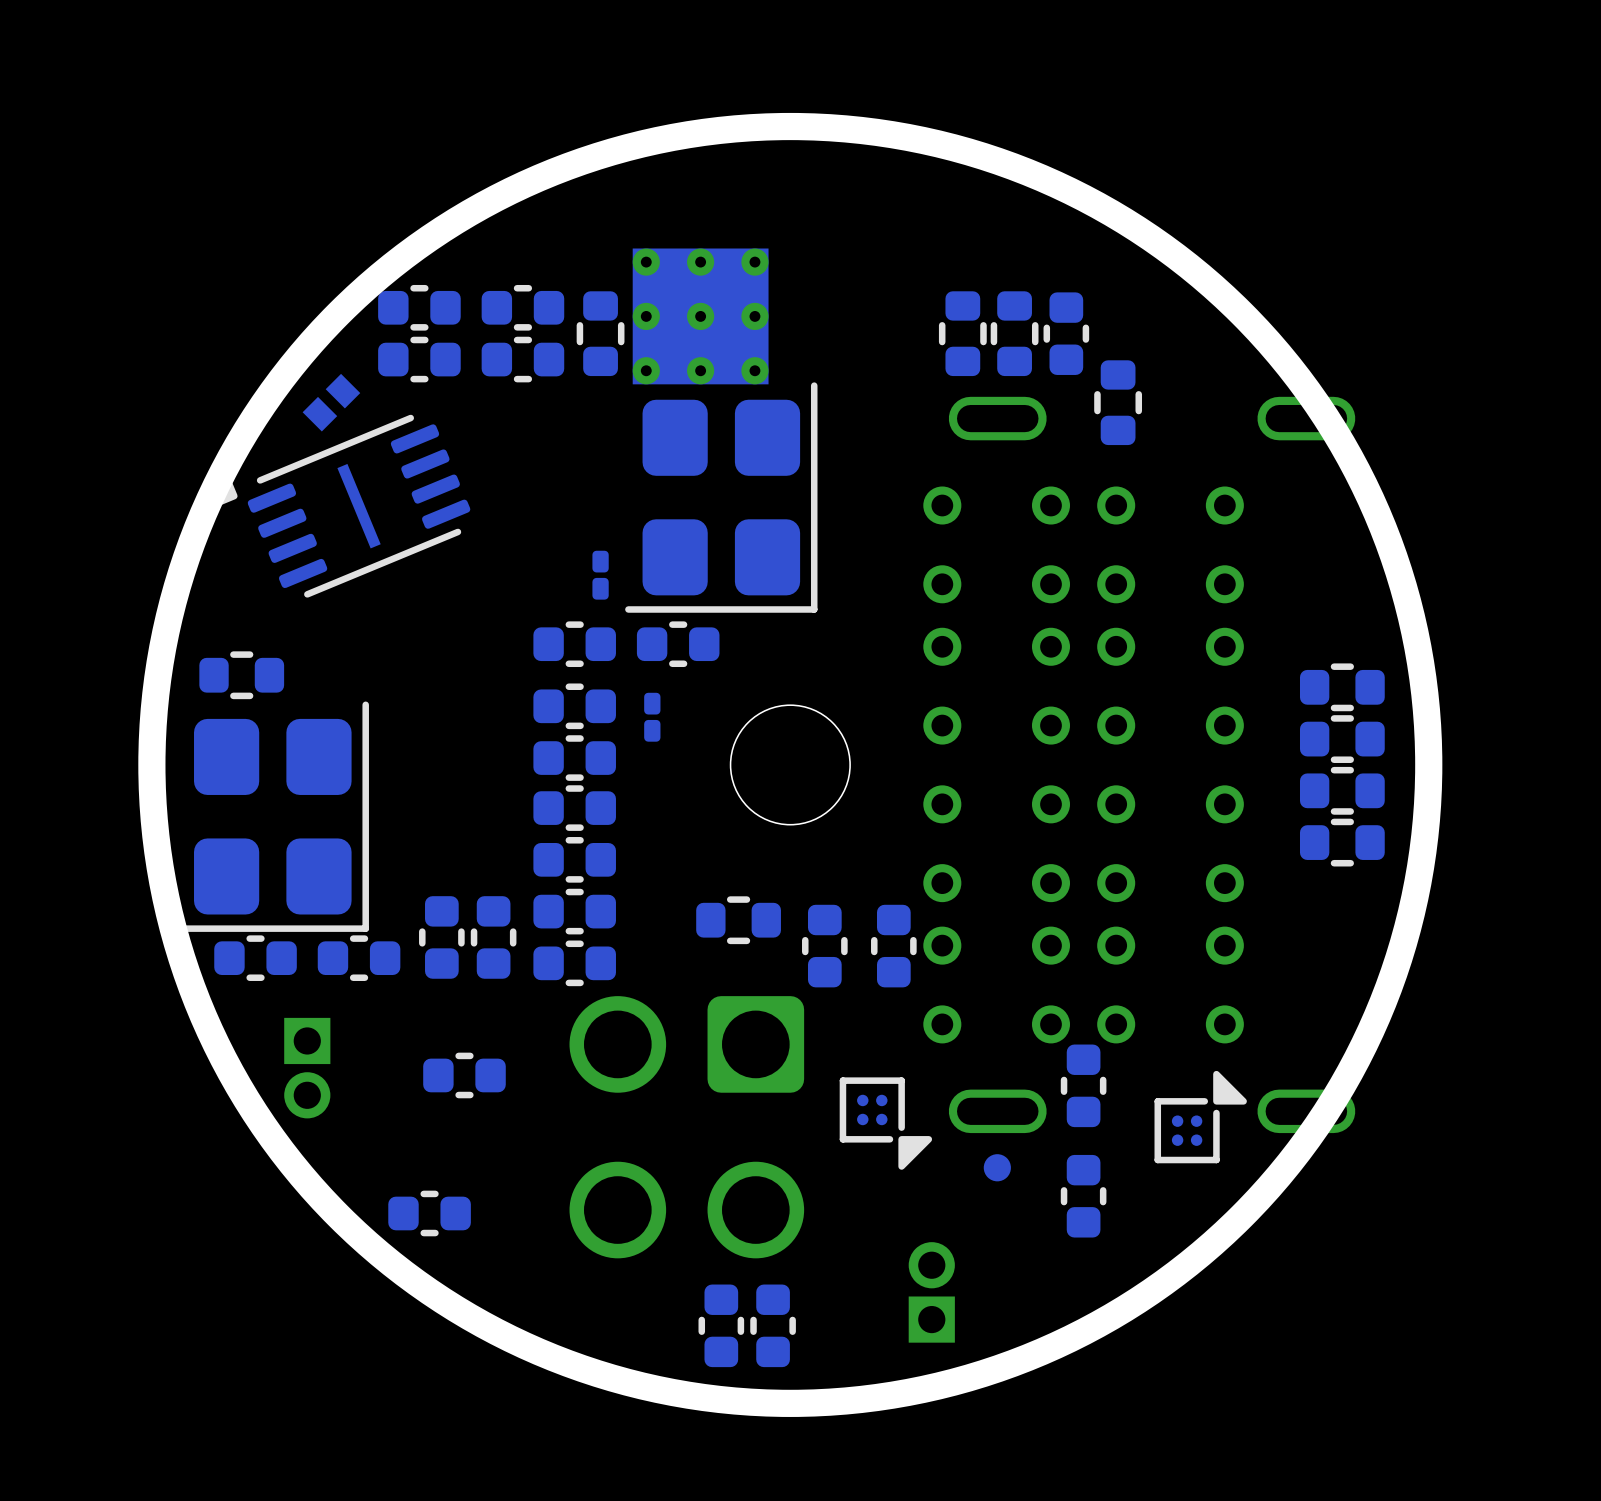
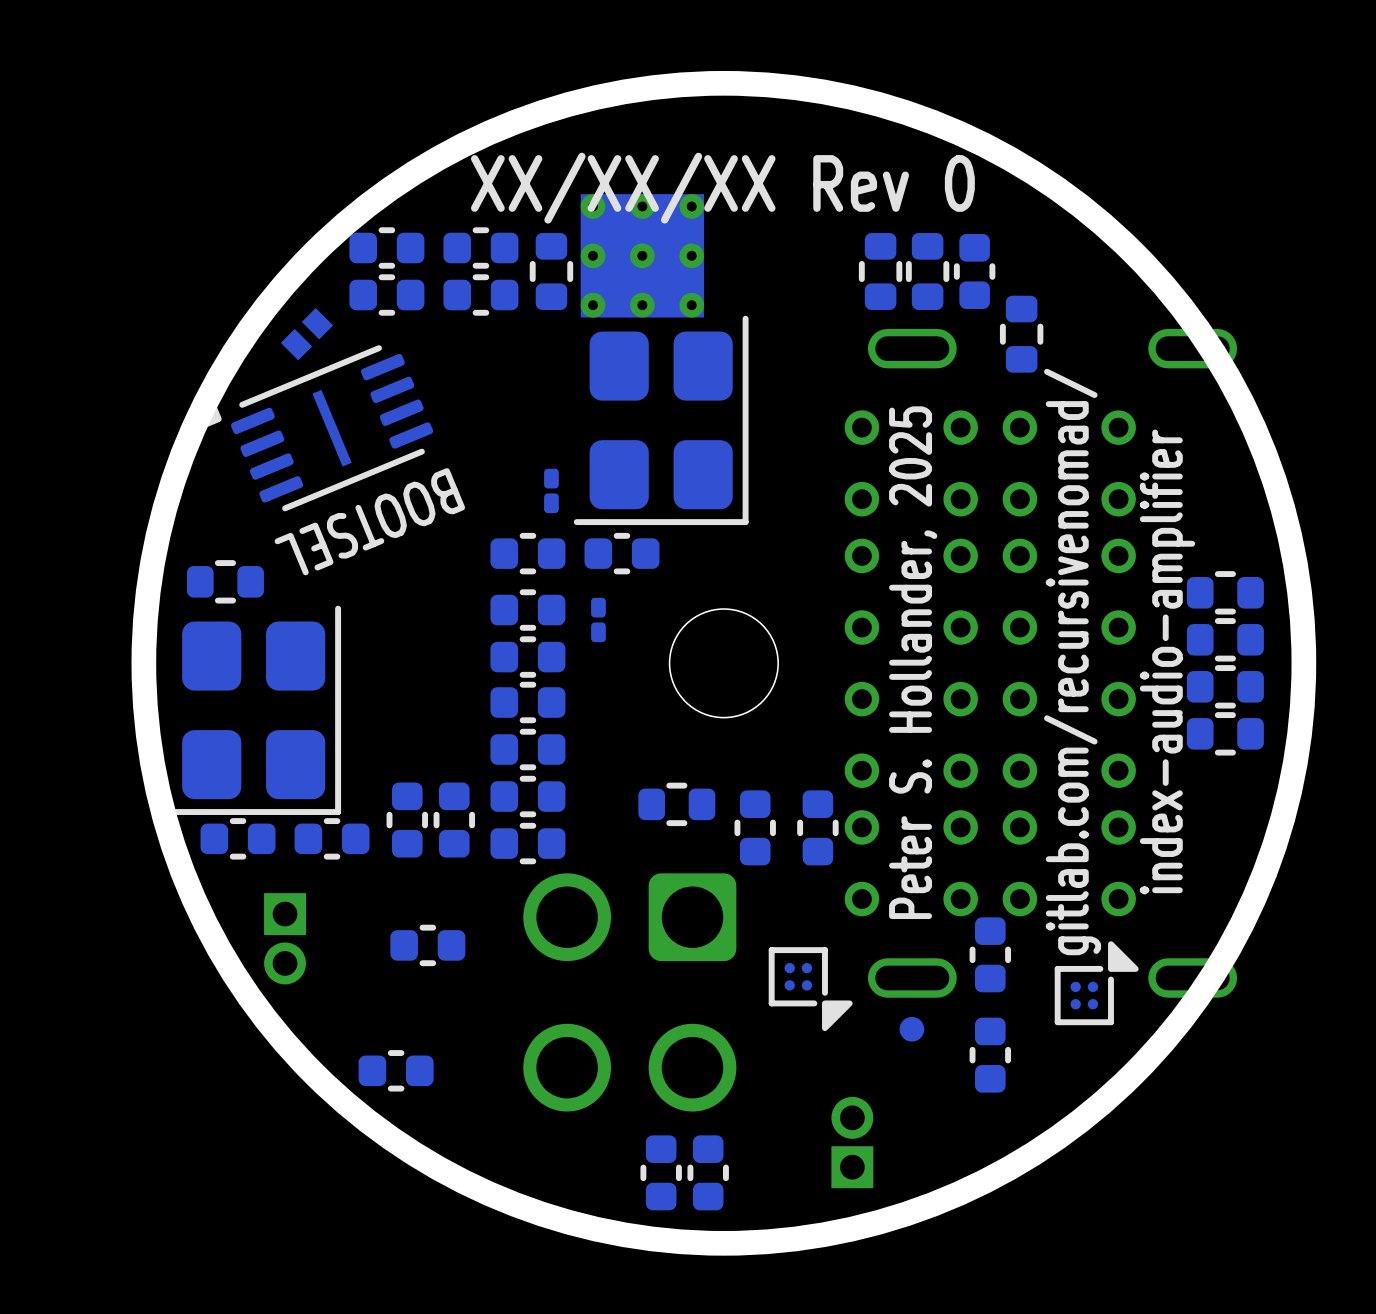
text: none -> XX/XX/XX Rev 0 (722, 188)
text: none -> BOOTSEL (369, 521)
text: none -> gitlab.com/recursivenomad/ (1072, 662)
text: none -> index-audio-amplifier (1167, 662)
text: none -> Peter S. Hollander, 2025 (913, 662)

